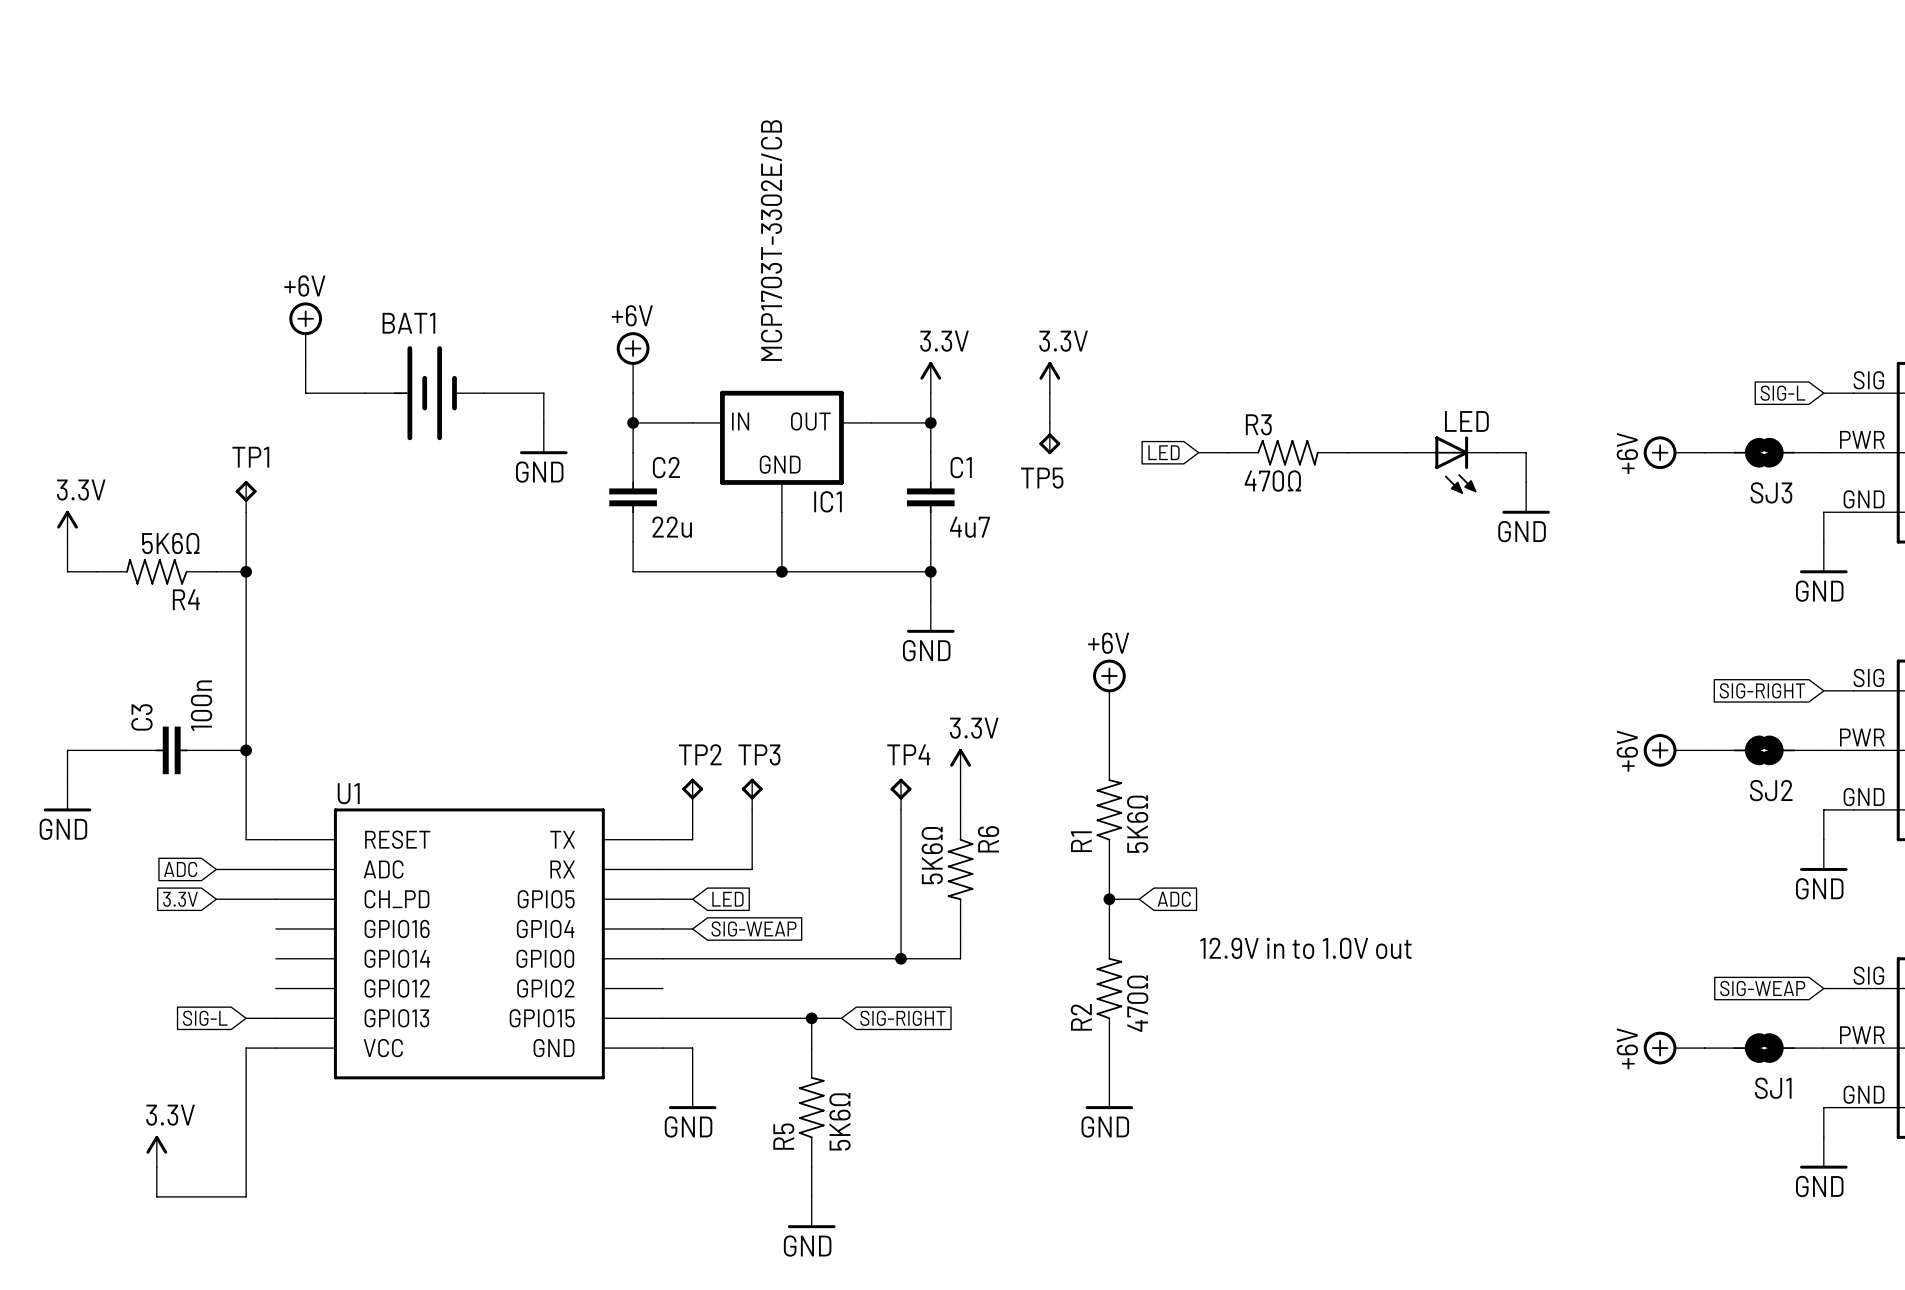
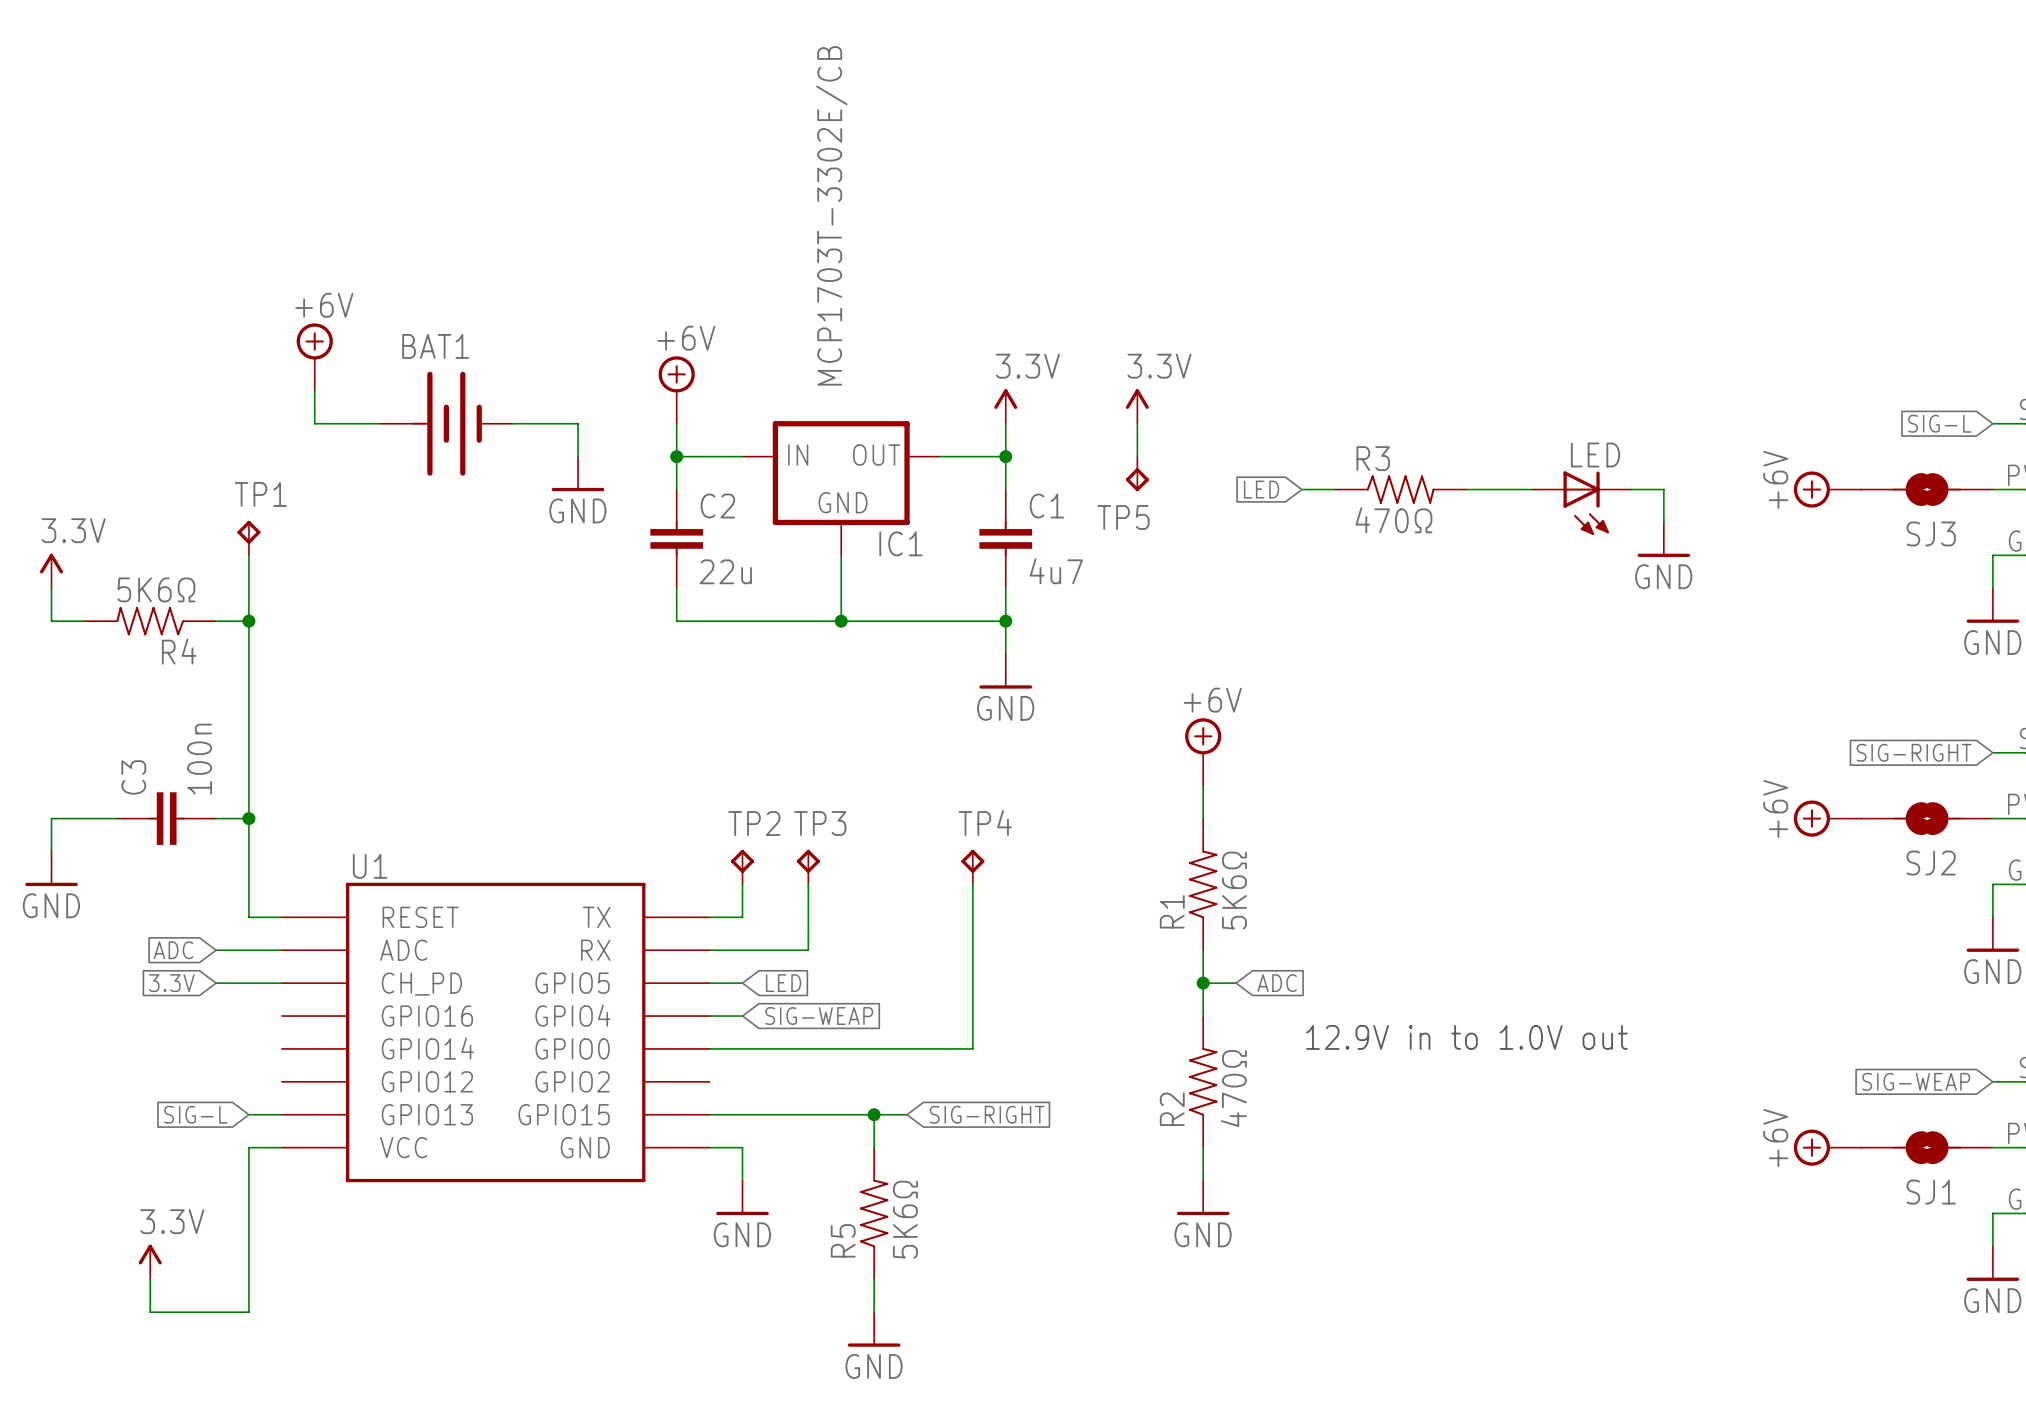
power symbol: 3.3V (960, 764) -> none
wire: (960, 780) (960, 809) -> none
R6: 5K6Ω (960, 869) -> none
wire: (960, 929) (960, 958) (901, 958) -> none
junction: (901, 958) -> none

